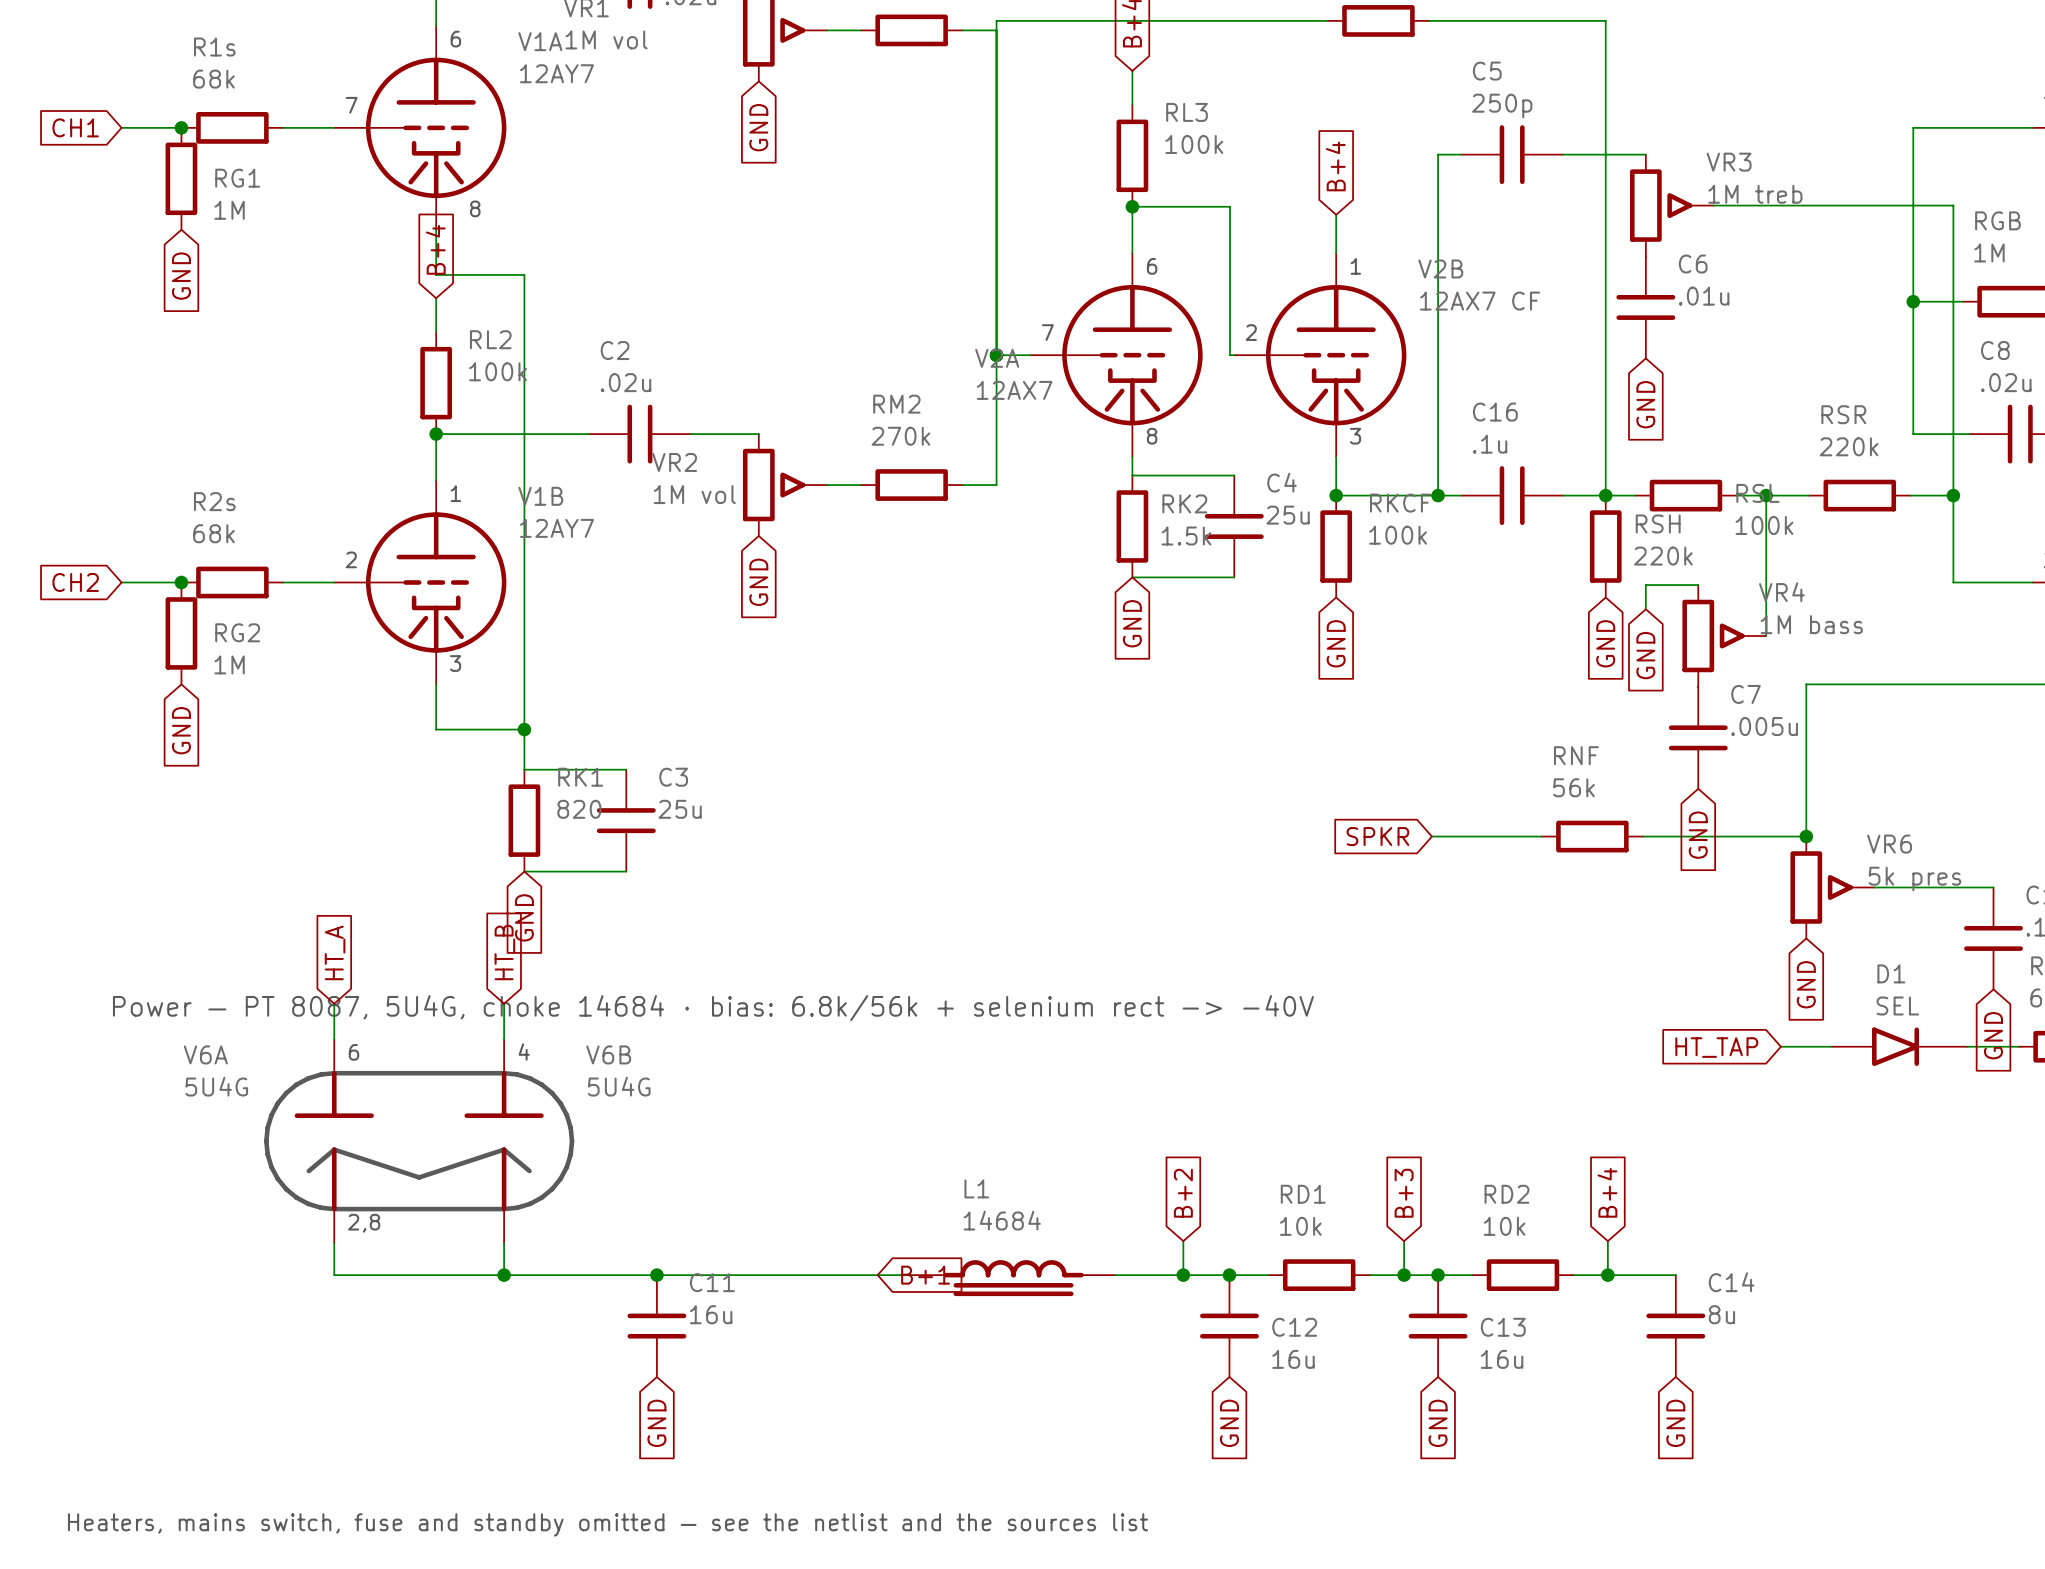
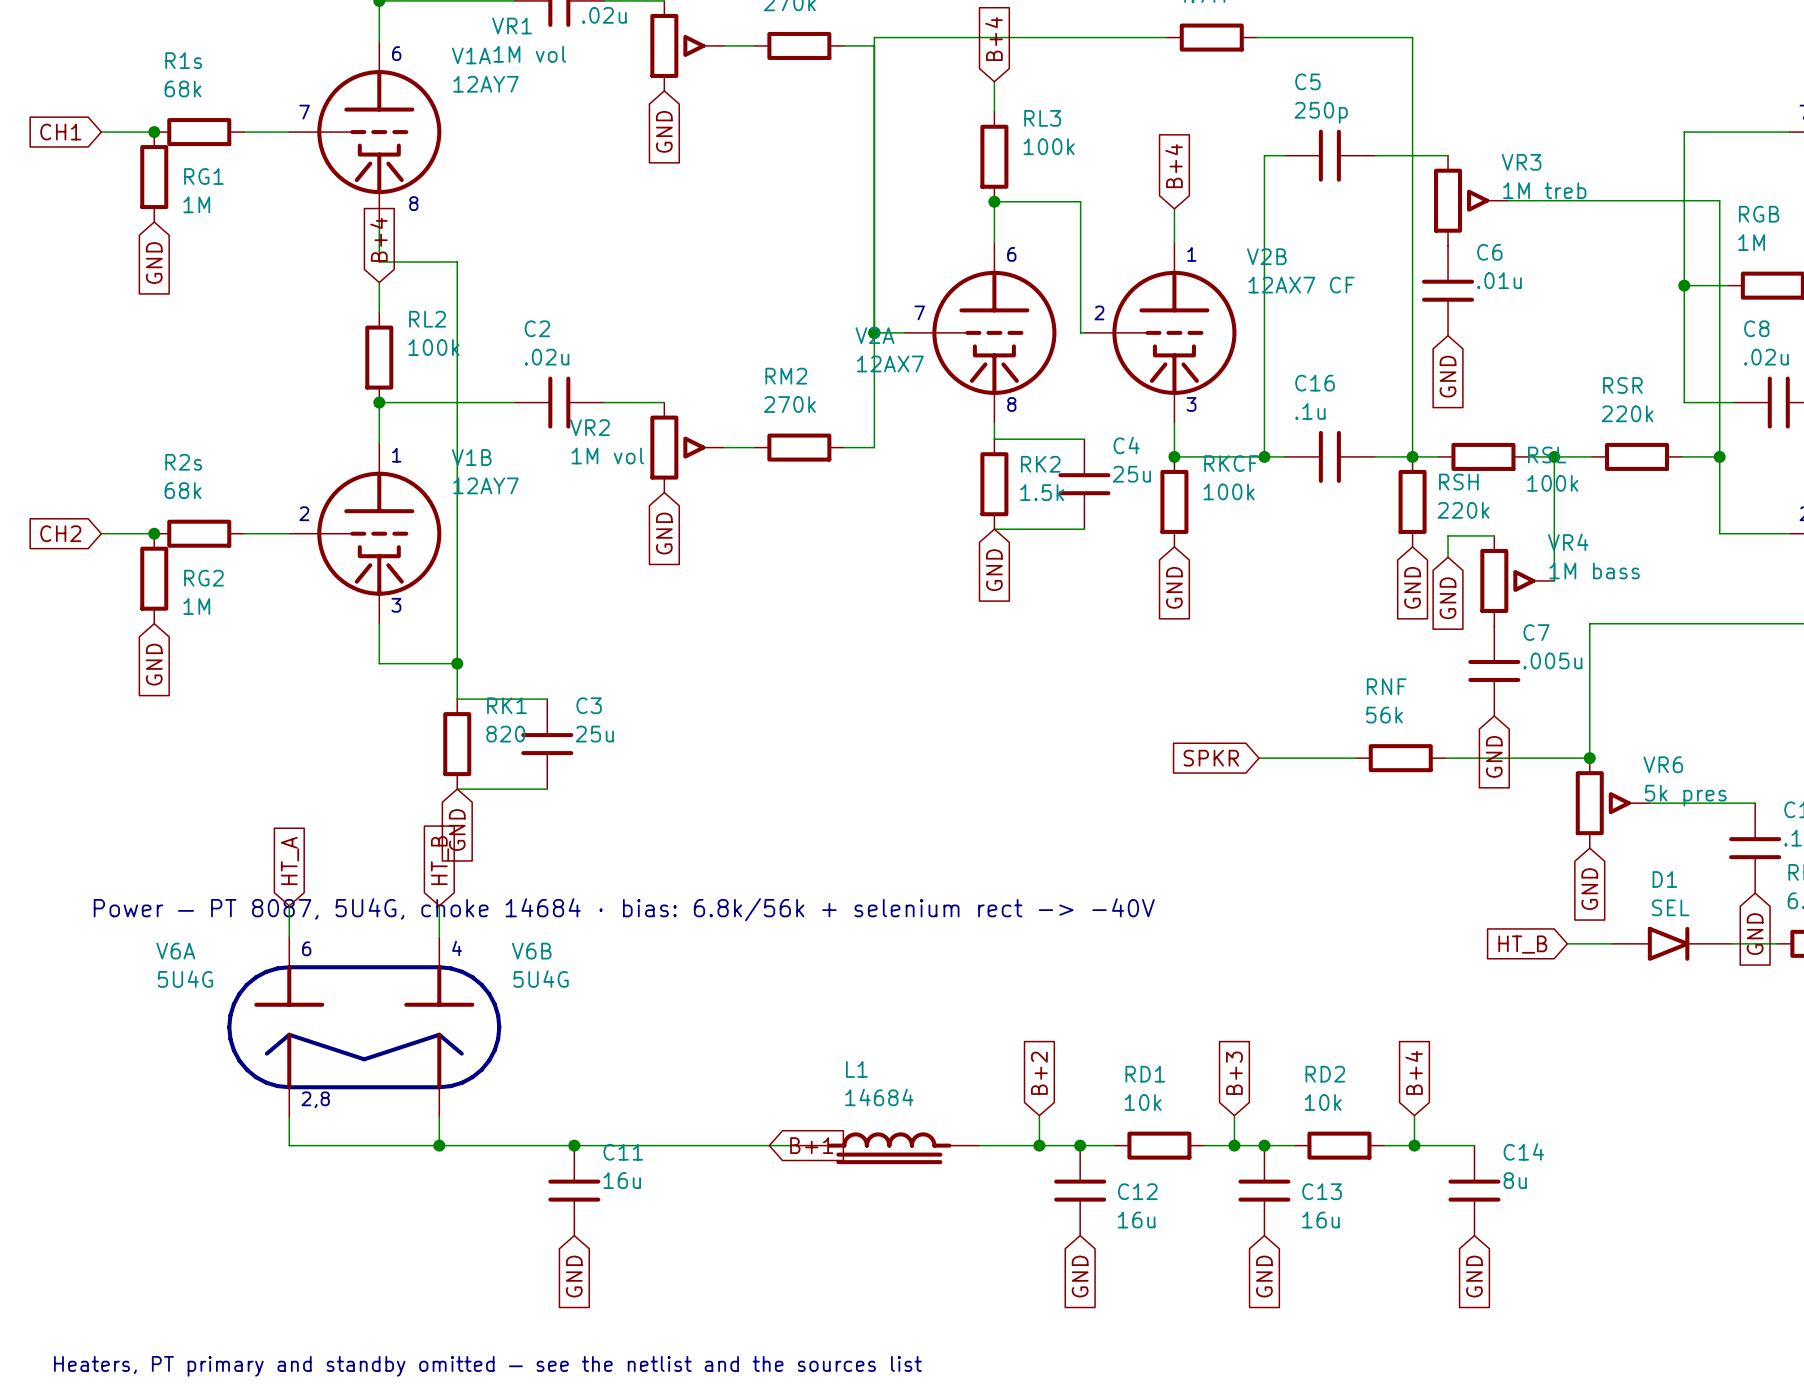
global label: HT_TAP (1716, 1047) -> HT_B (1522, 944)
text: Heaters, mains switch, fuse and standby omitted — see the netlist and the sources list (608, 1524) -> Heaters, PT primary and standby omitted — see the netlist and the sources list (487, 1366)

